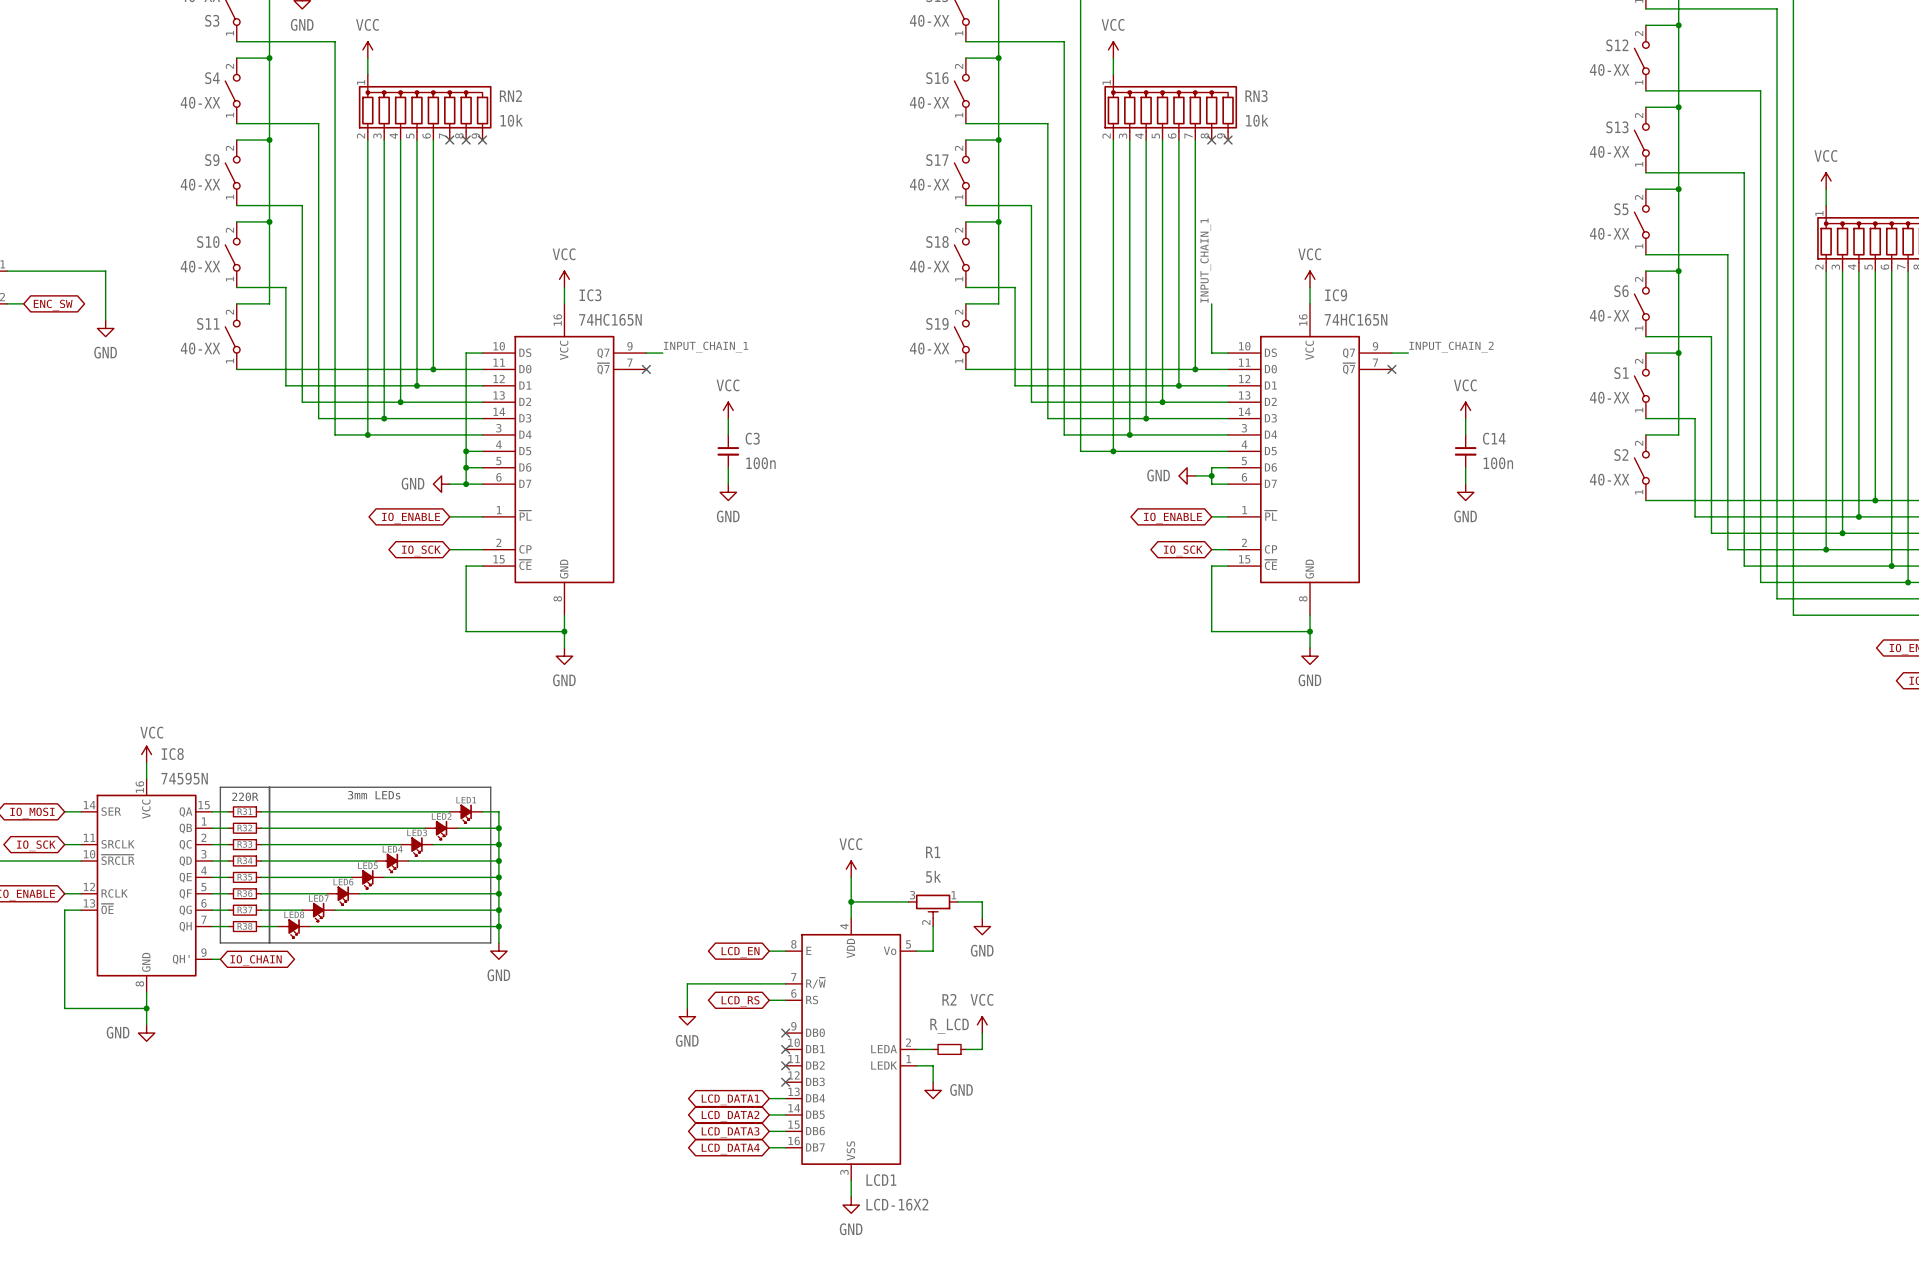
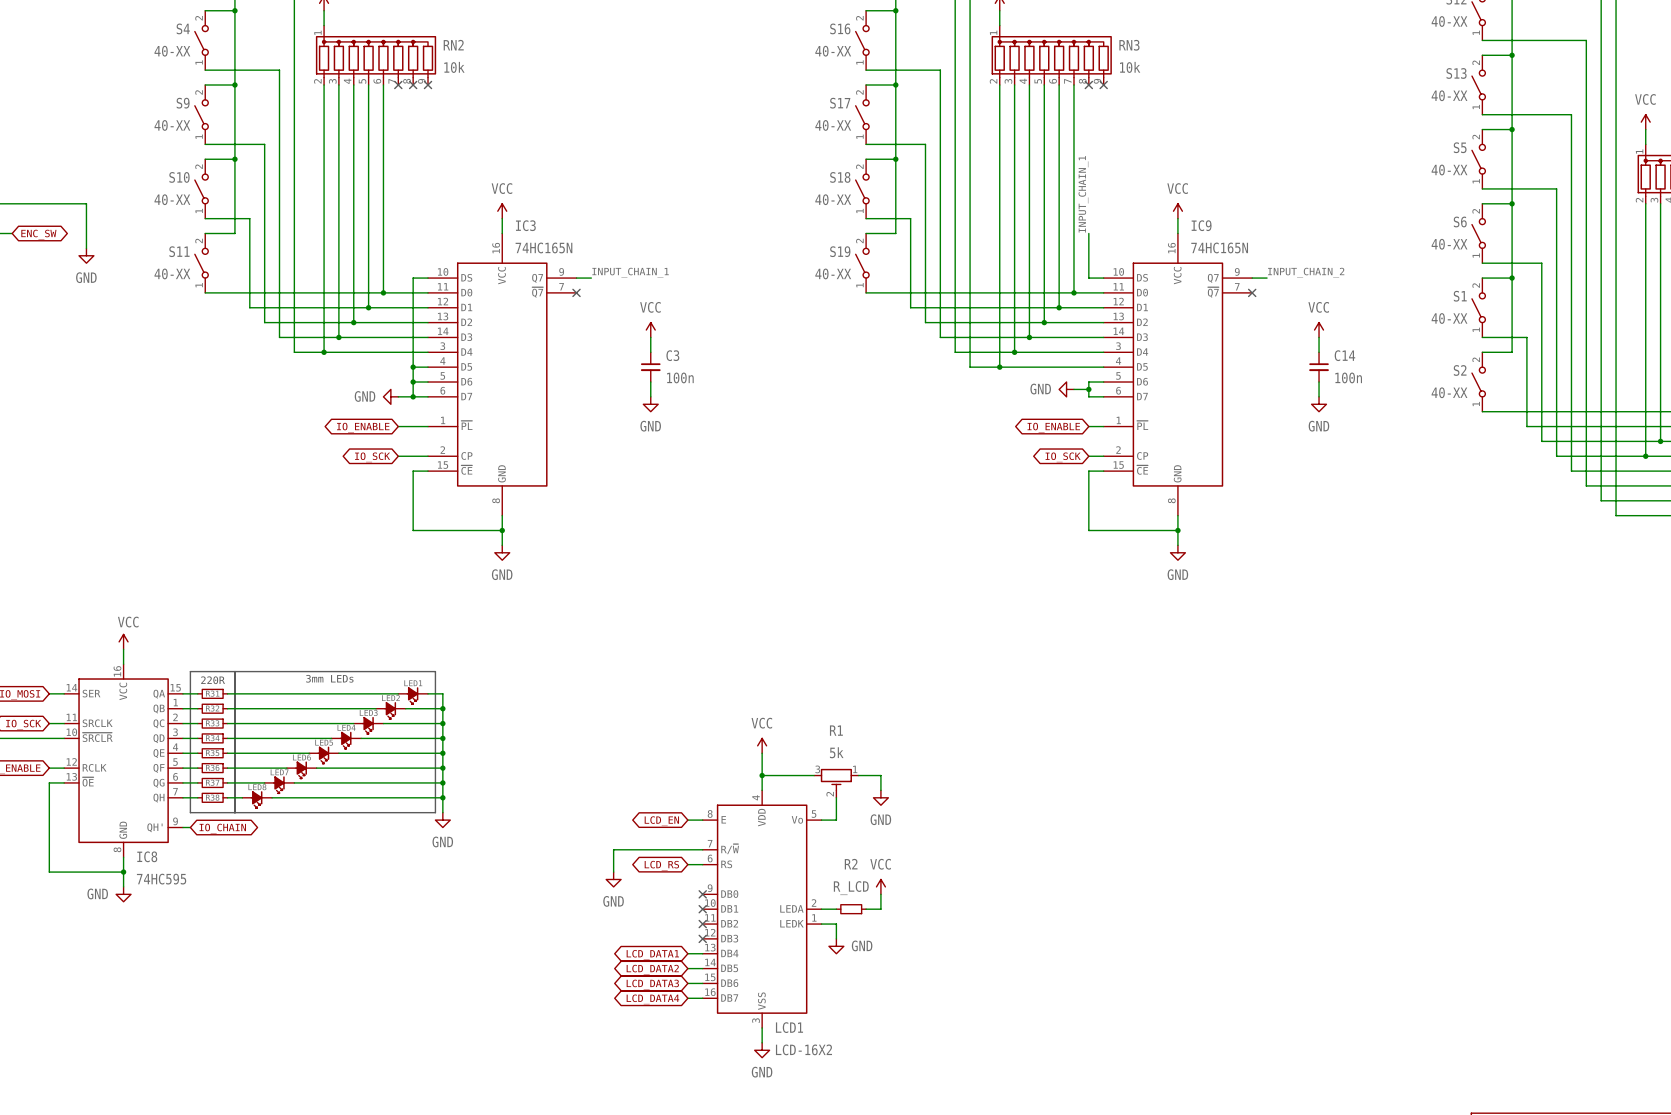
IC8 name position: IC8 (172, 754) -> IC8 (147, 856)
IC8 value: 74595N (184, 778) -> 74HC595 (161, 879)

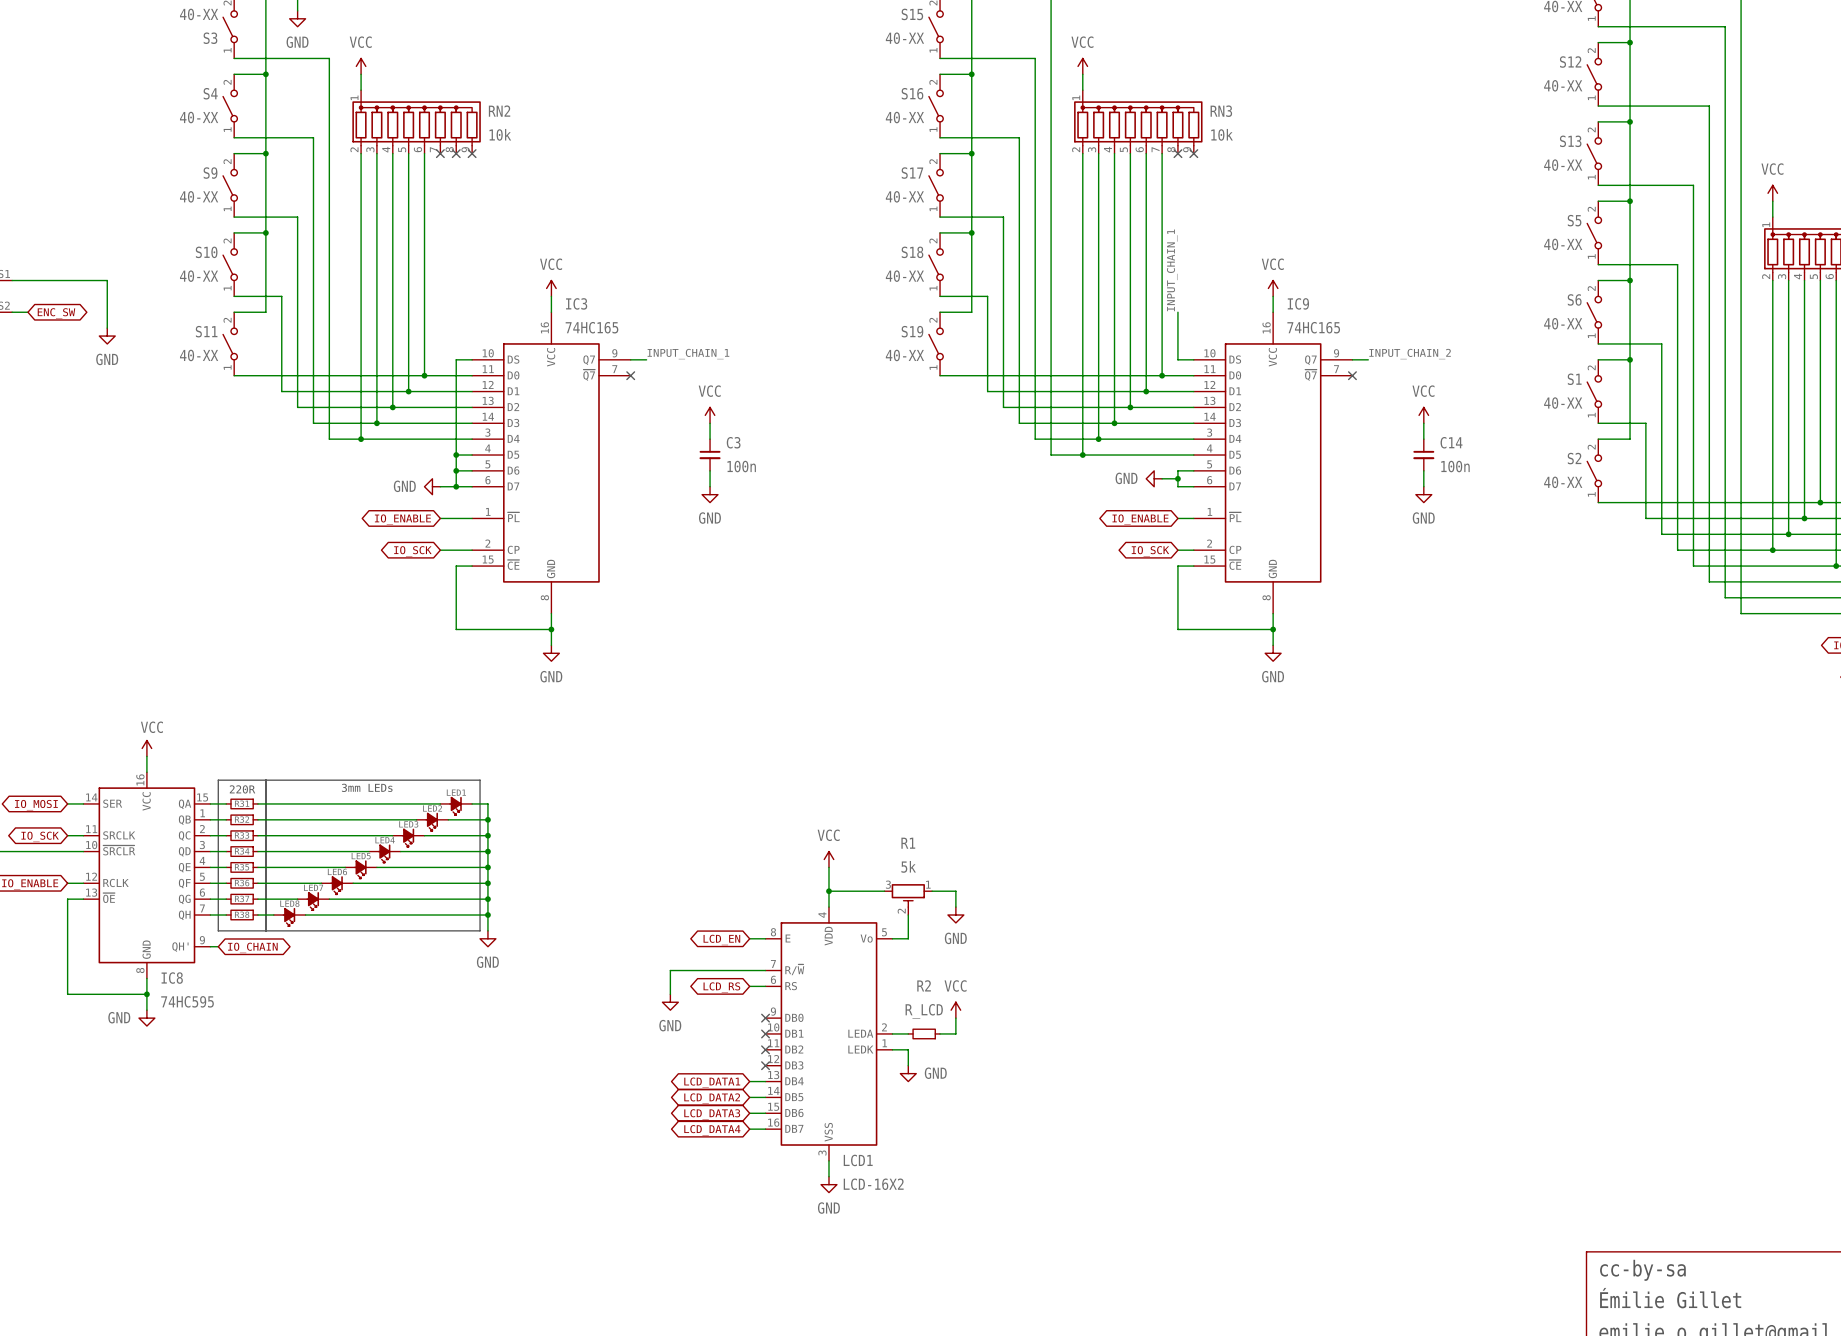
IC3 value: 74HC165N (543, 247) -> 74HC165 (591, 327)
IC9 value: 74HC165N (1219, 247) -> 74HC165 (1313, 327)

